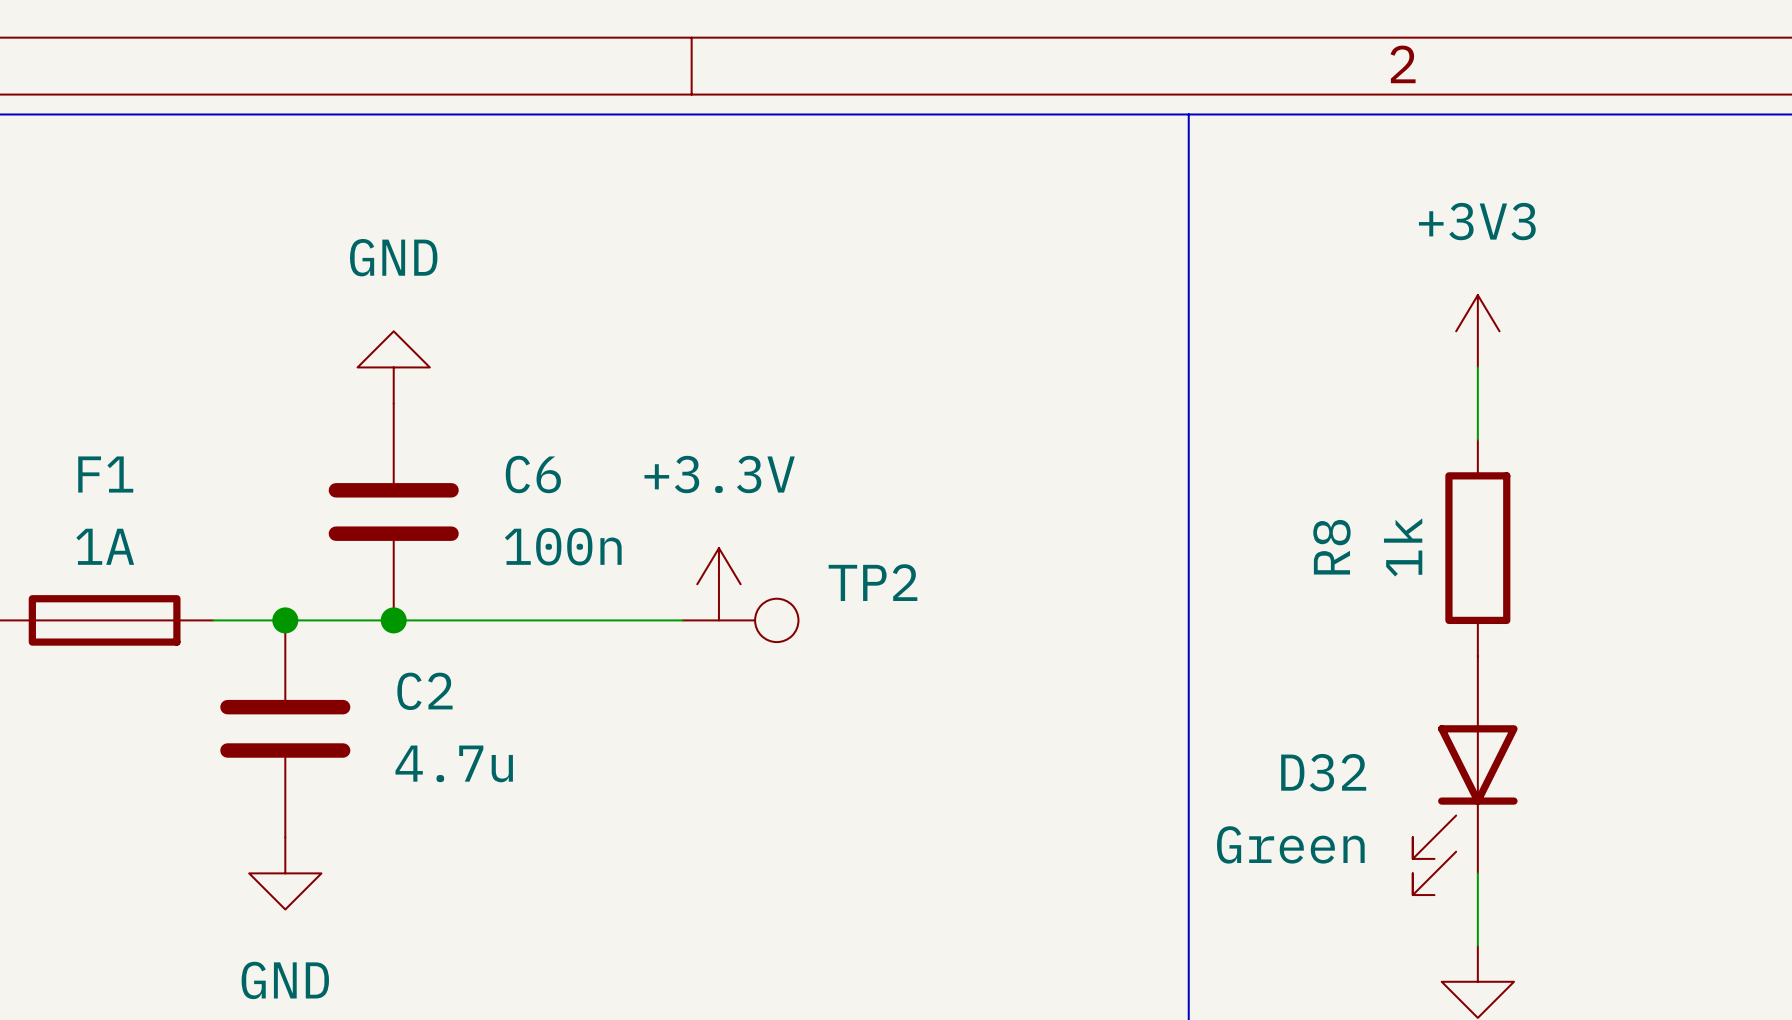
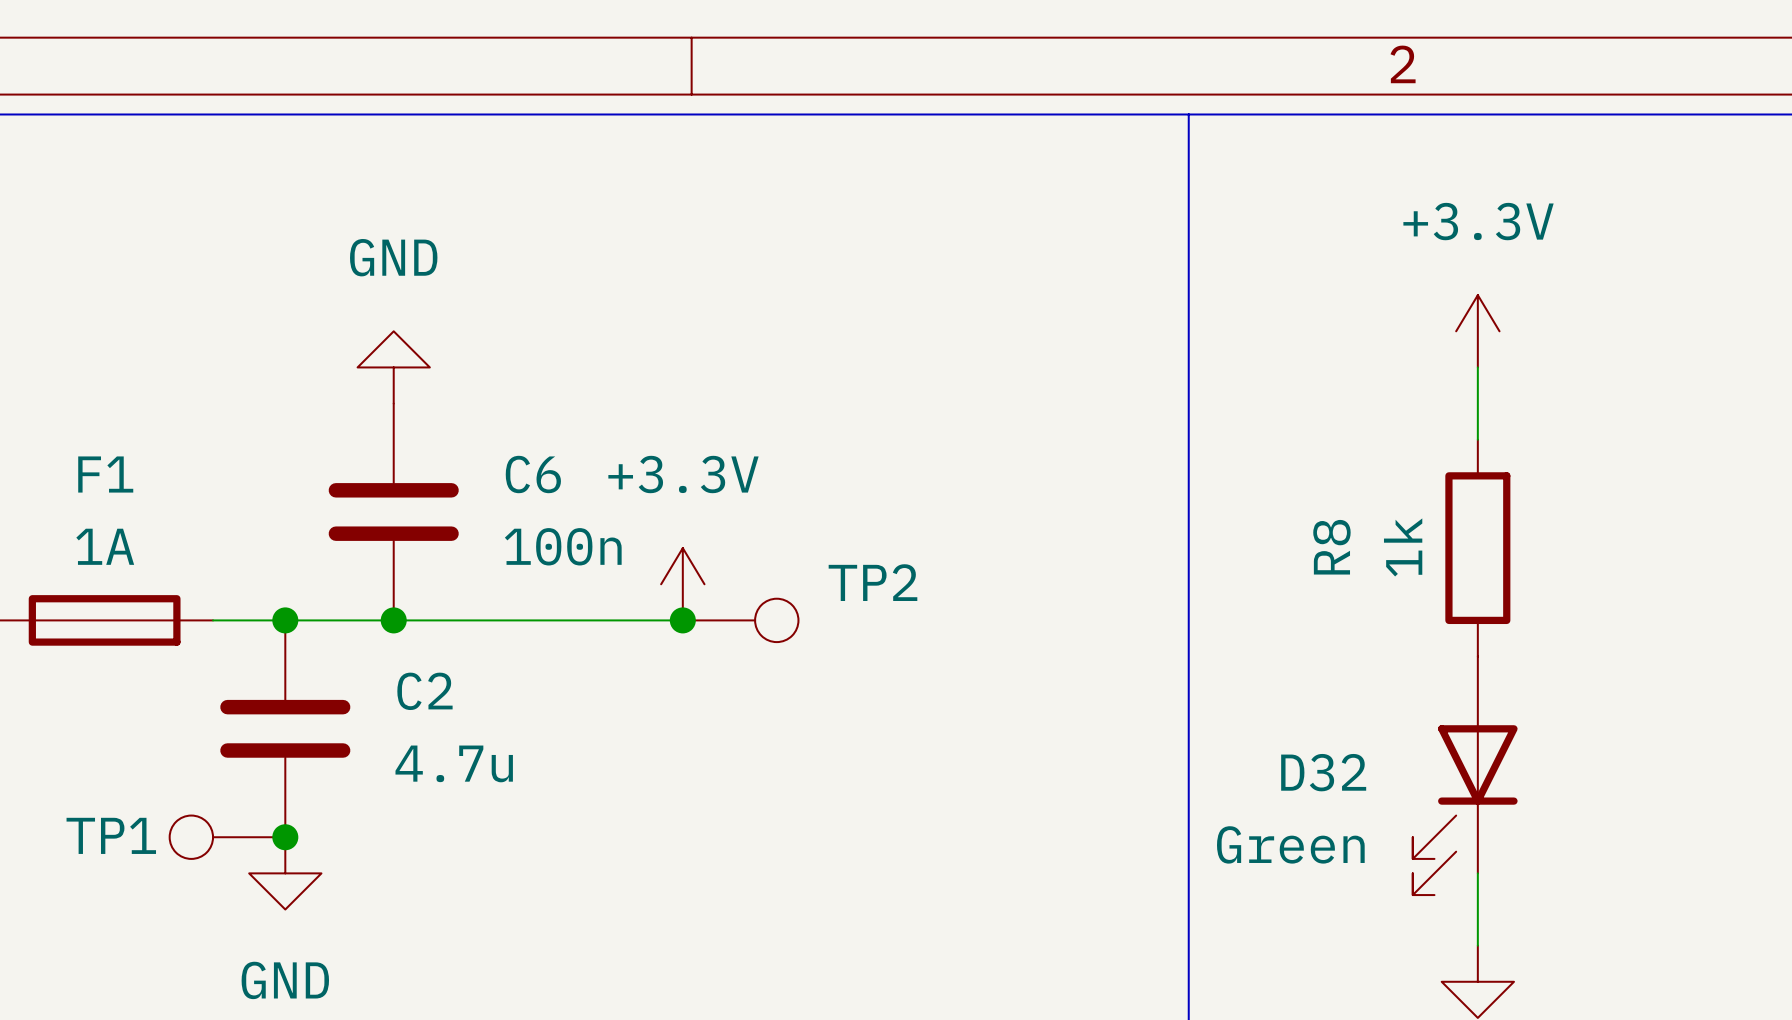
power symbol: +3V3 (1477, 331) -> +3.3V (1477, 331)
power symbol position: +3.3V (718, 584) -> +3.3V (682, 584)
junction: none -> (682, 620)
TP1: none -> (227, 837)
junction: none -> (285, 837)

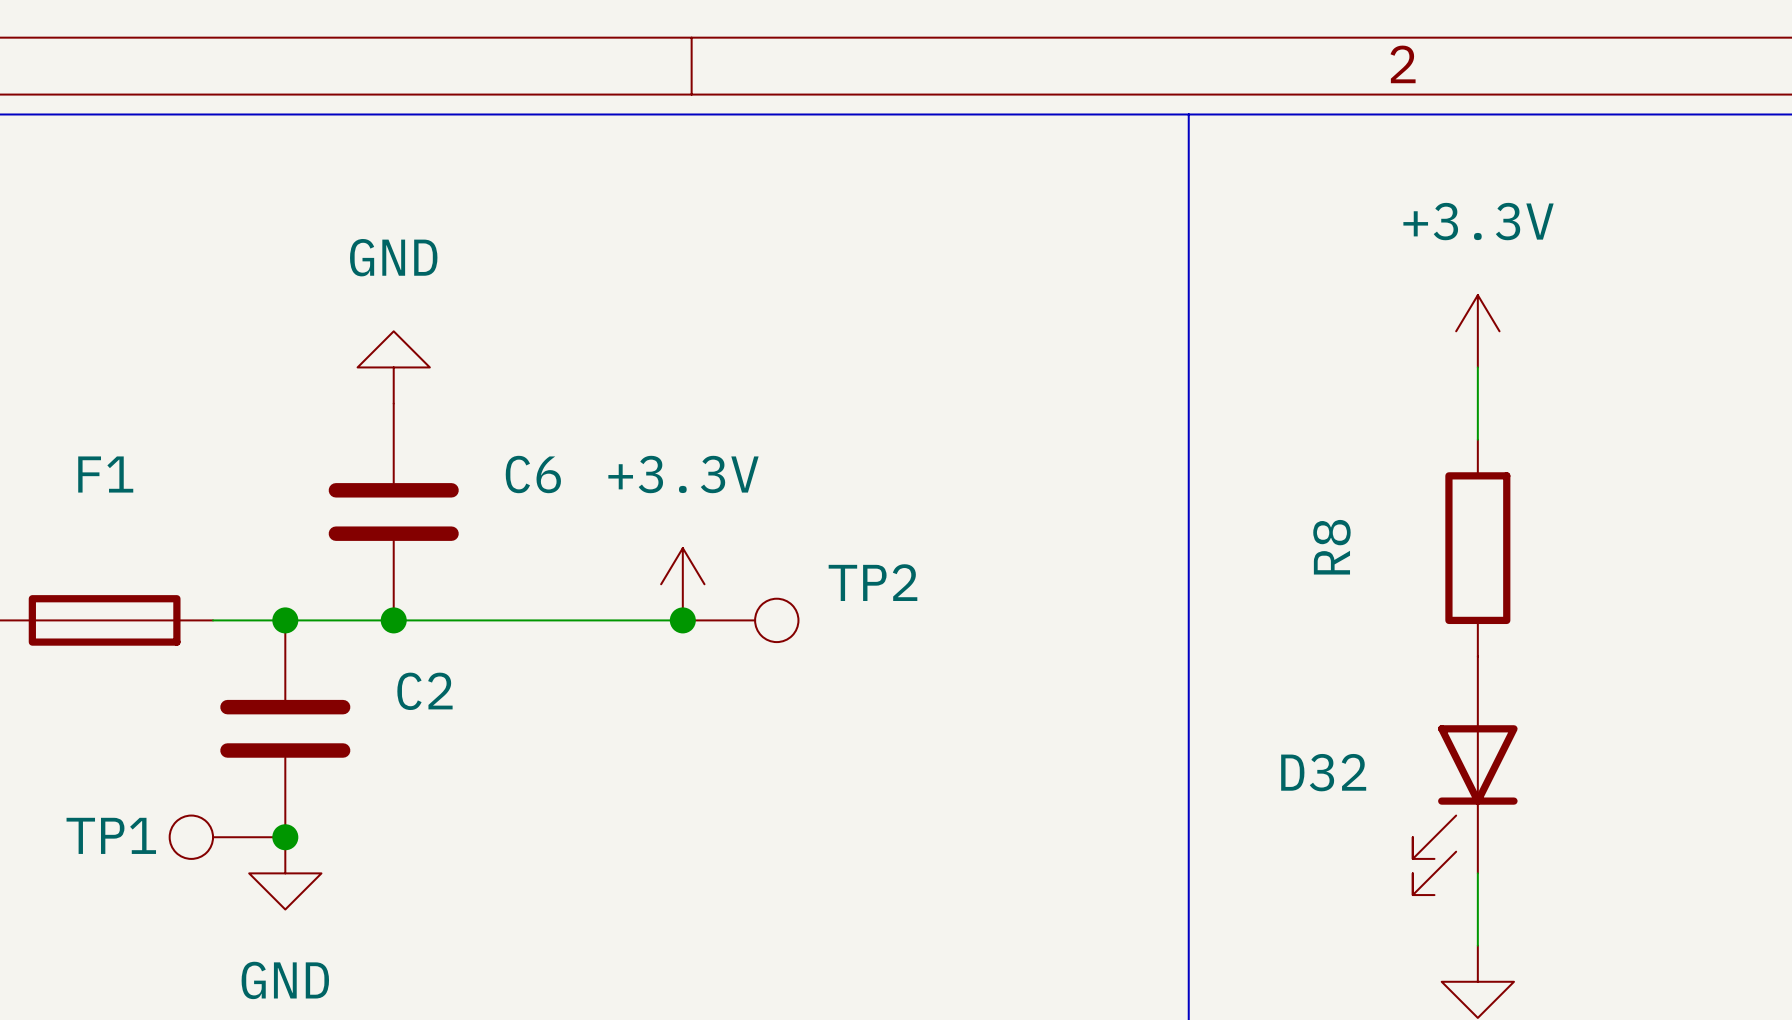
F1 value: 1A (105, 546) -> none
C6 value: 100n (563, 546) -> none
R8 value: 1k (1403, 547) -> none
C2 value: 4.7u (454, 763) -> none
D32 value: Green (1290, 844) -> none

